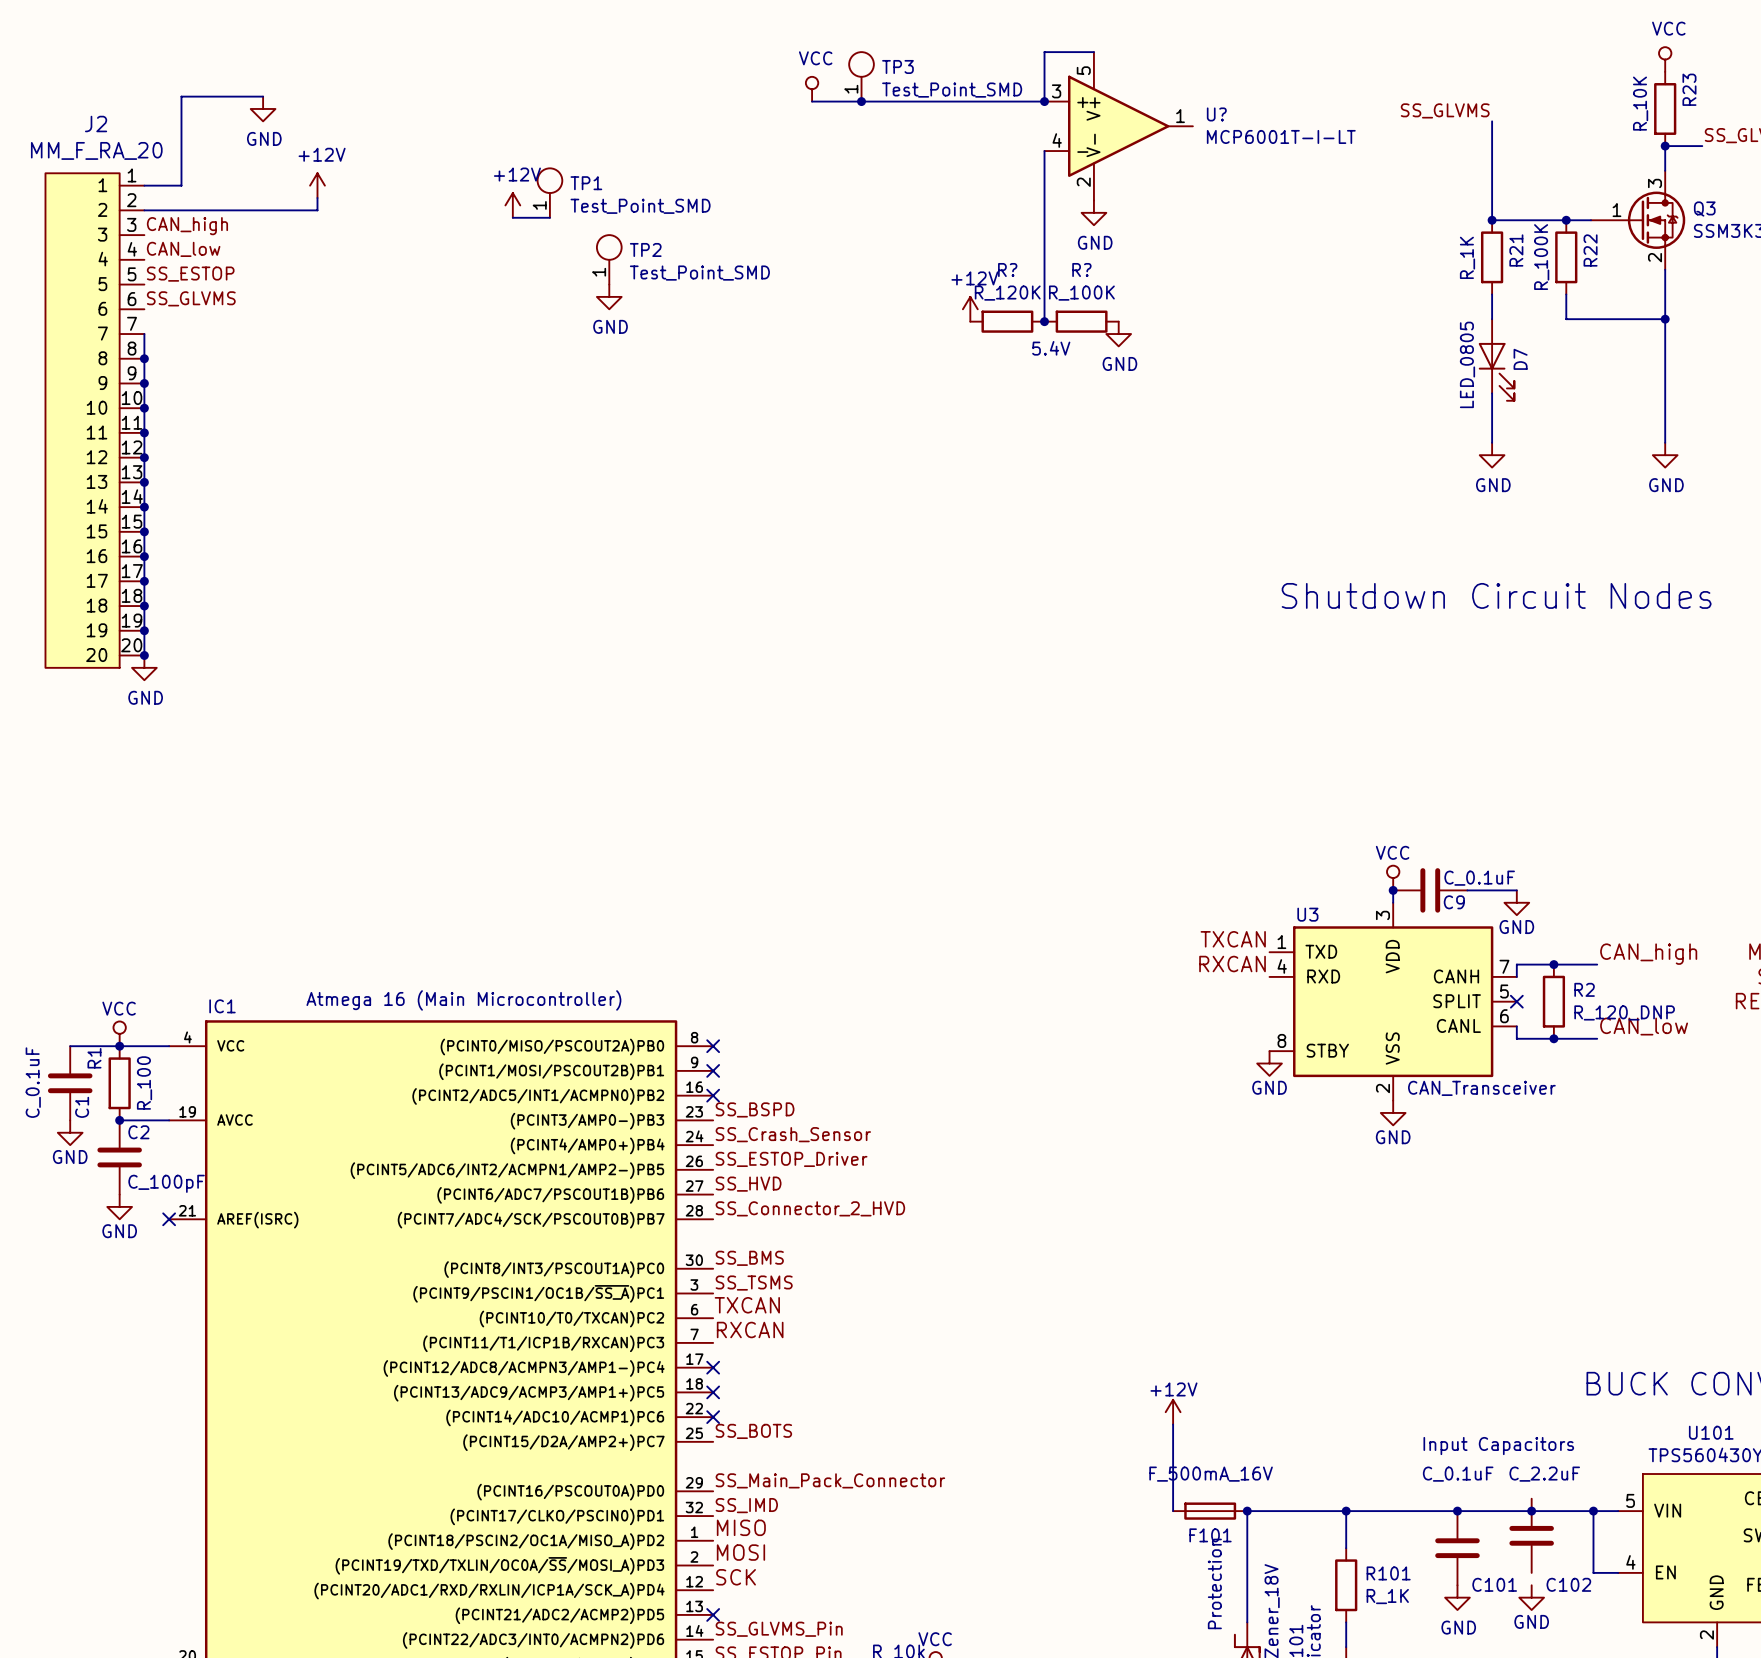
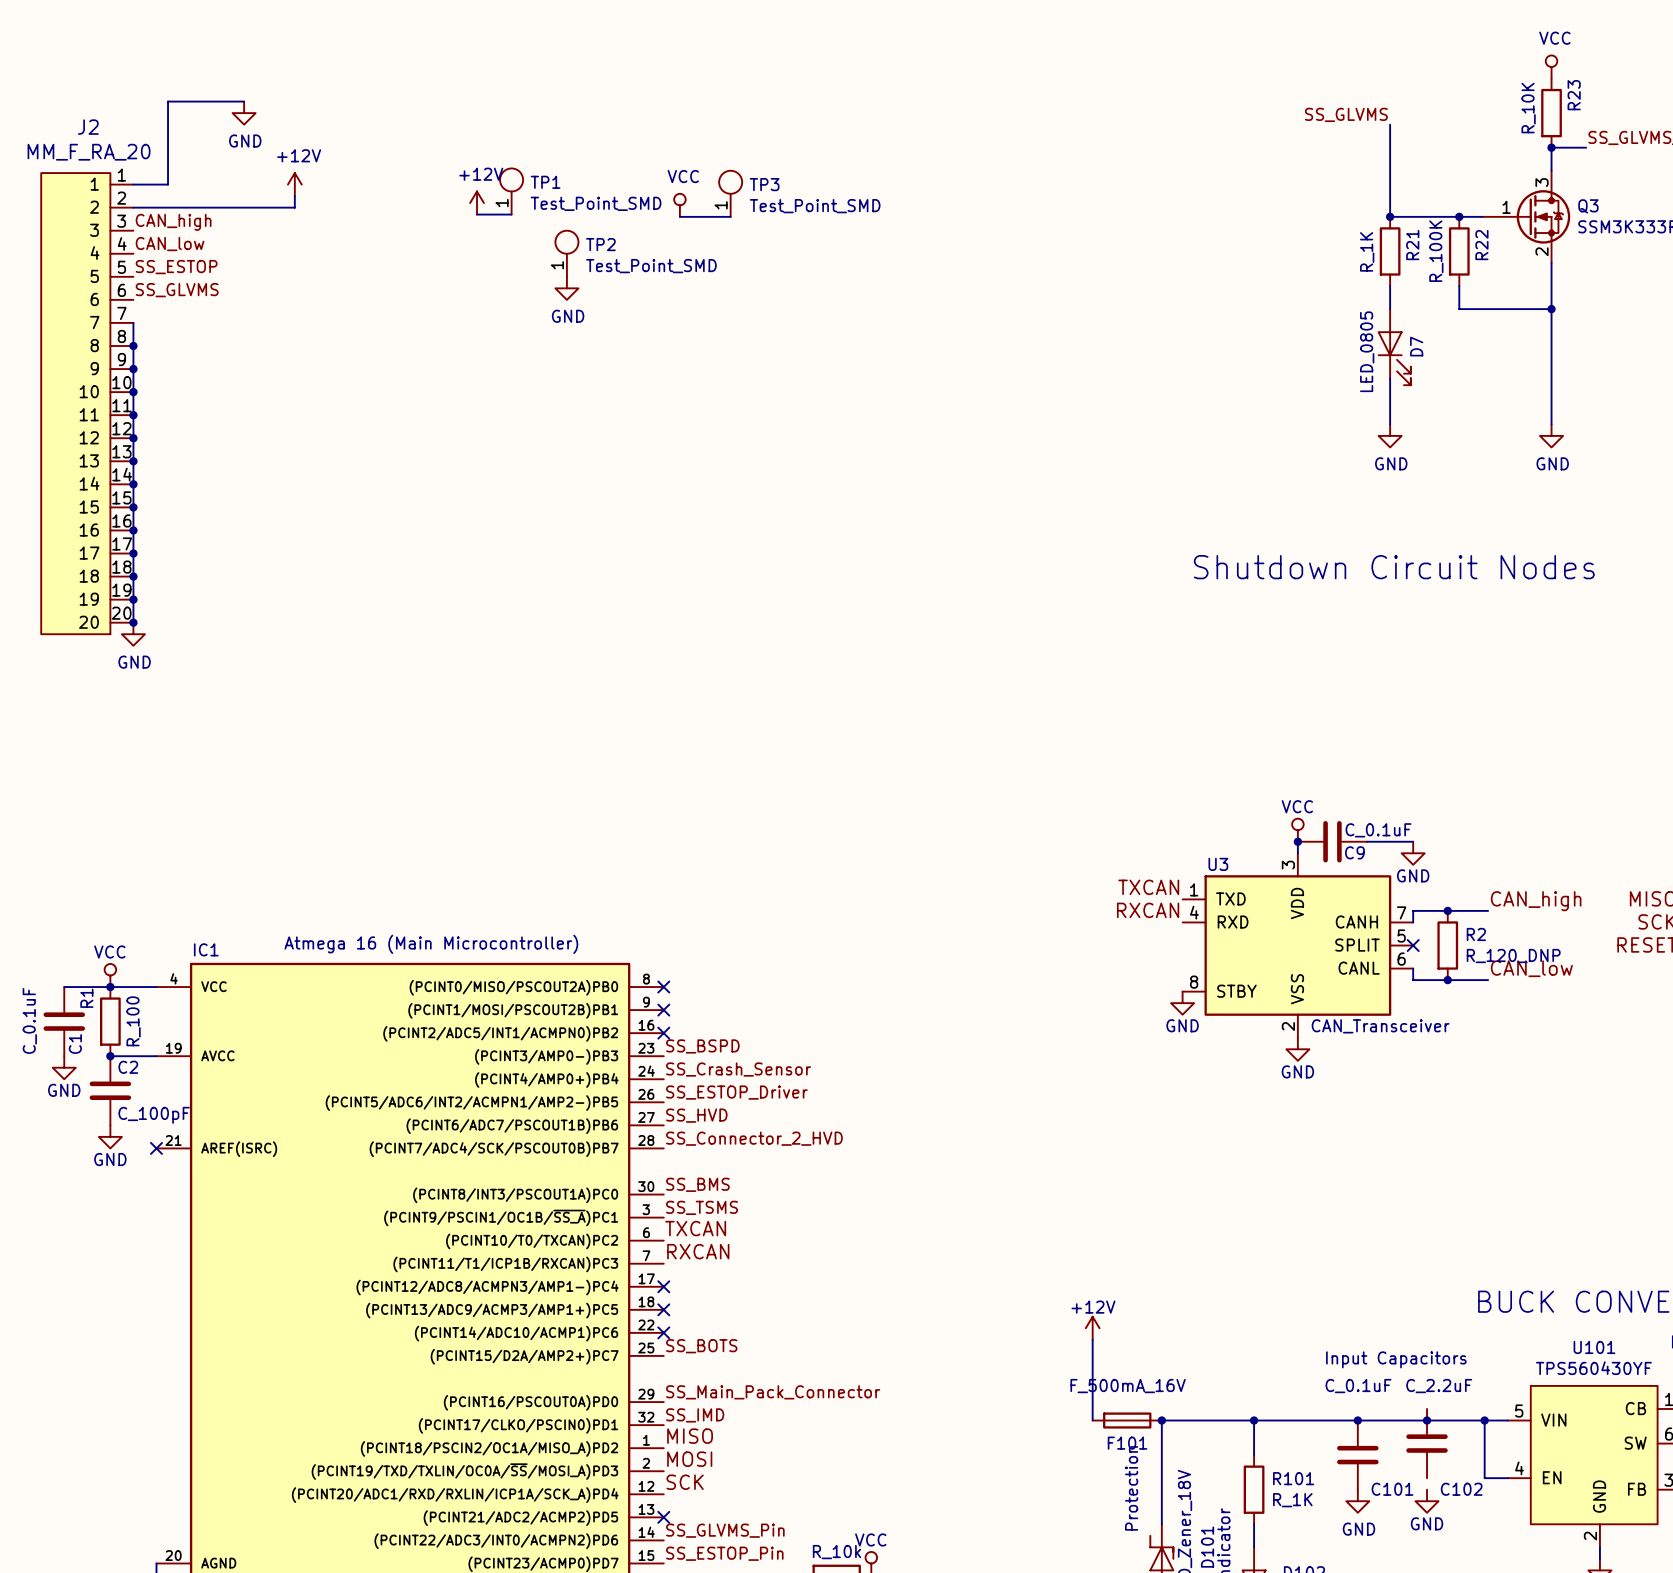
wire: (1093, 52) (1044, 52) (1044, 101) (812, 101) -> none
TP3 position: (861, 76) -> (730, 193)
power symbol position: VCC (812, 89) -> VCC (679, 205)
junction: (861, 101) -> none
junction: (1044, 101) -> none
U?: MCP6001T-I-LT (1118, 126) -> none
wire: (1044, 151) (1044, 321) -> none
power symbol: GND (1093, 212) -> none
wire: none -> (679, 216) (730, 216)
power symbol: +12V (970, 309) -> none
R?: R_120K (1007, 321) -> none
junction: (1044, 321) -> none
R?: R_100K (1081, 321) -> none
power symbol: GND (1118, 334) -> none
text: 5.4V (1051, 348) -> none

